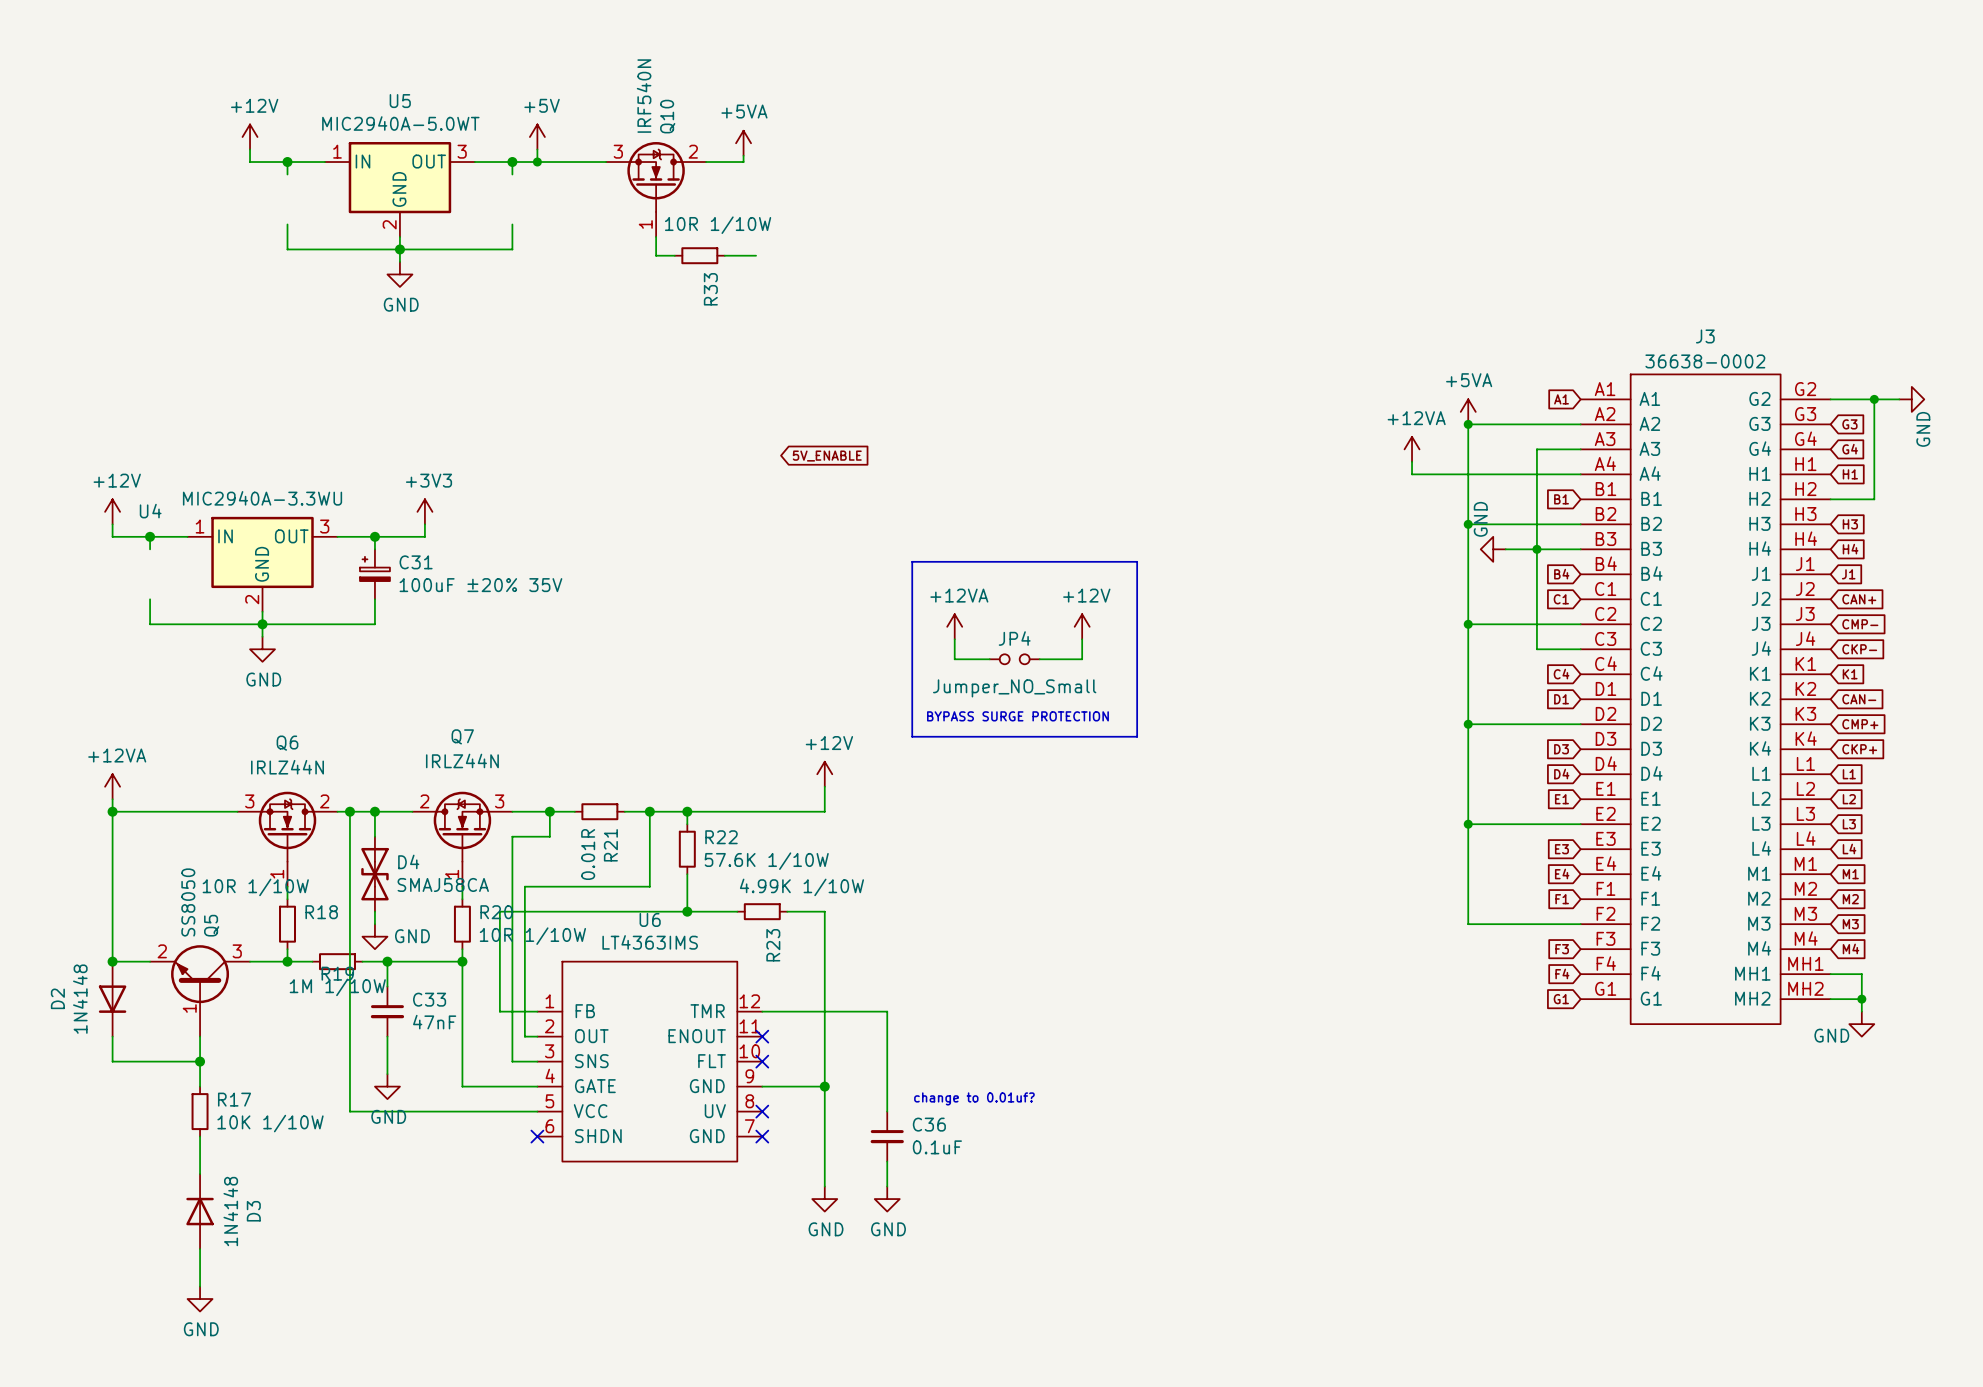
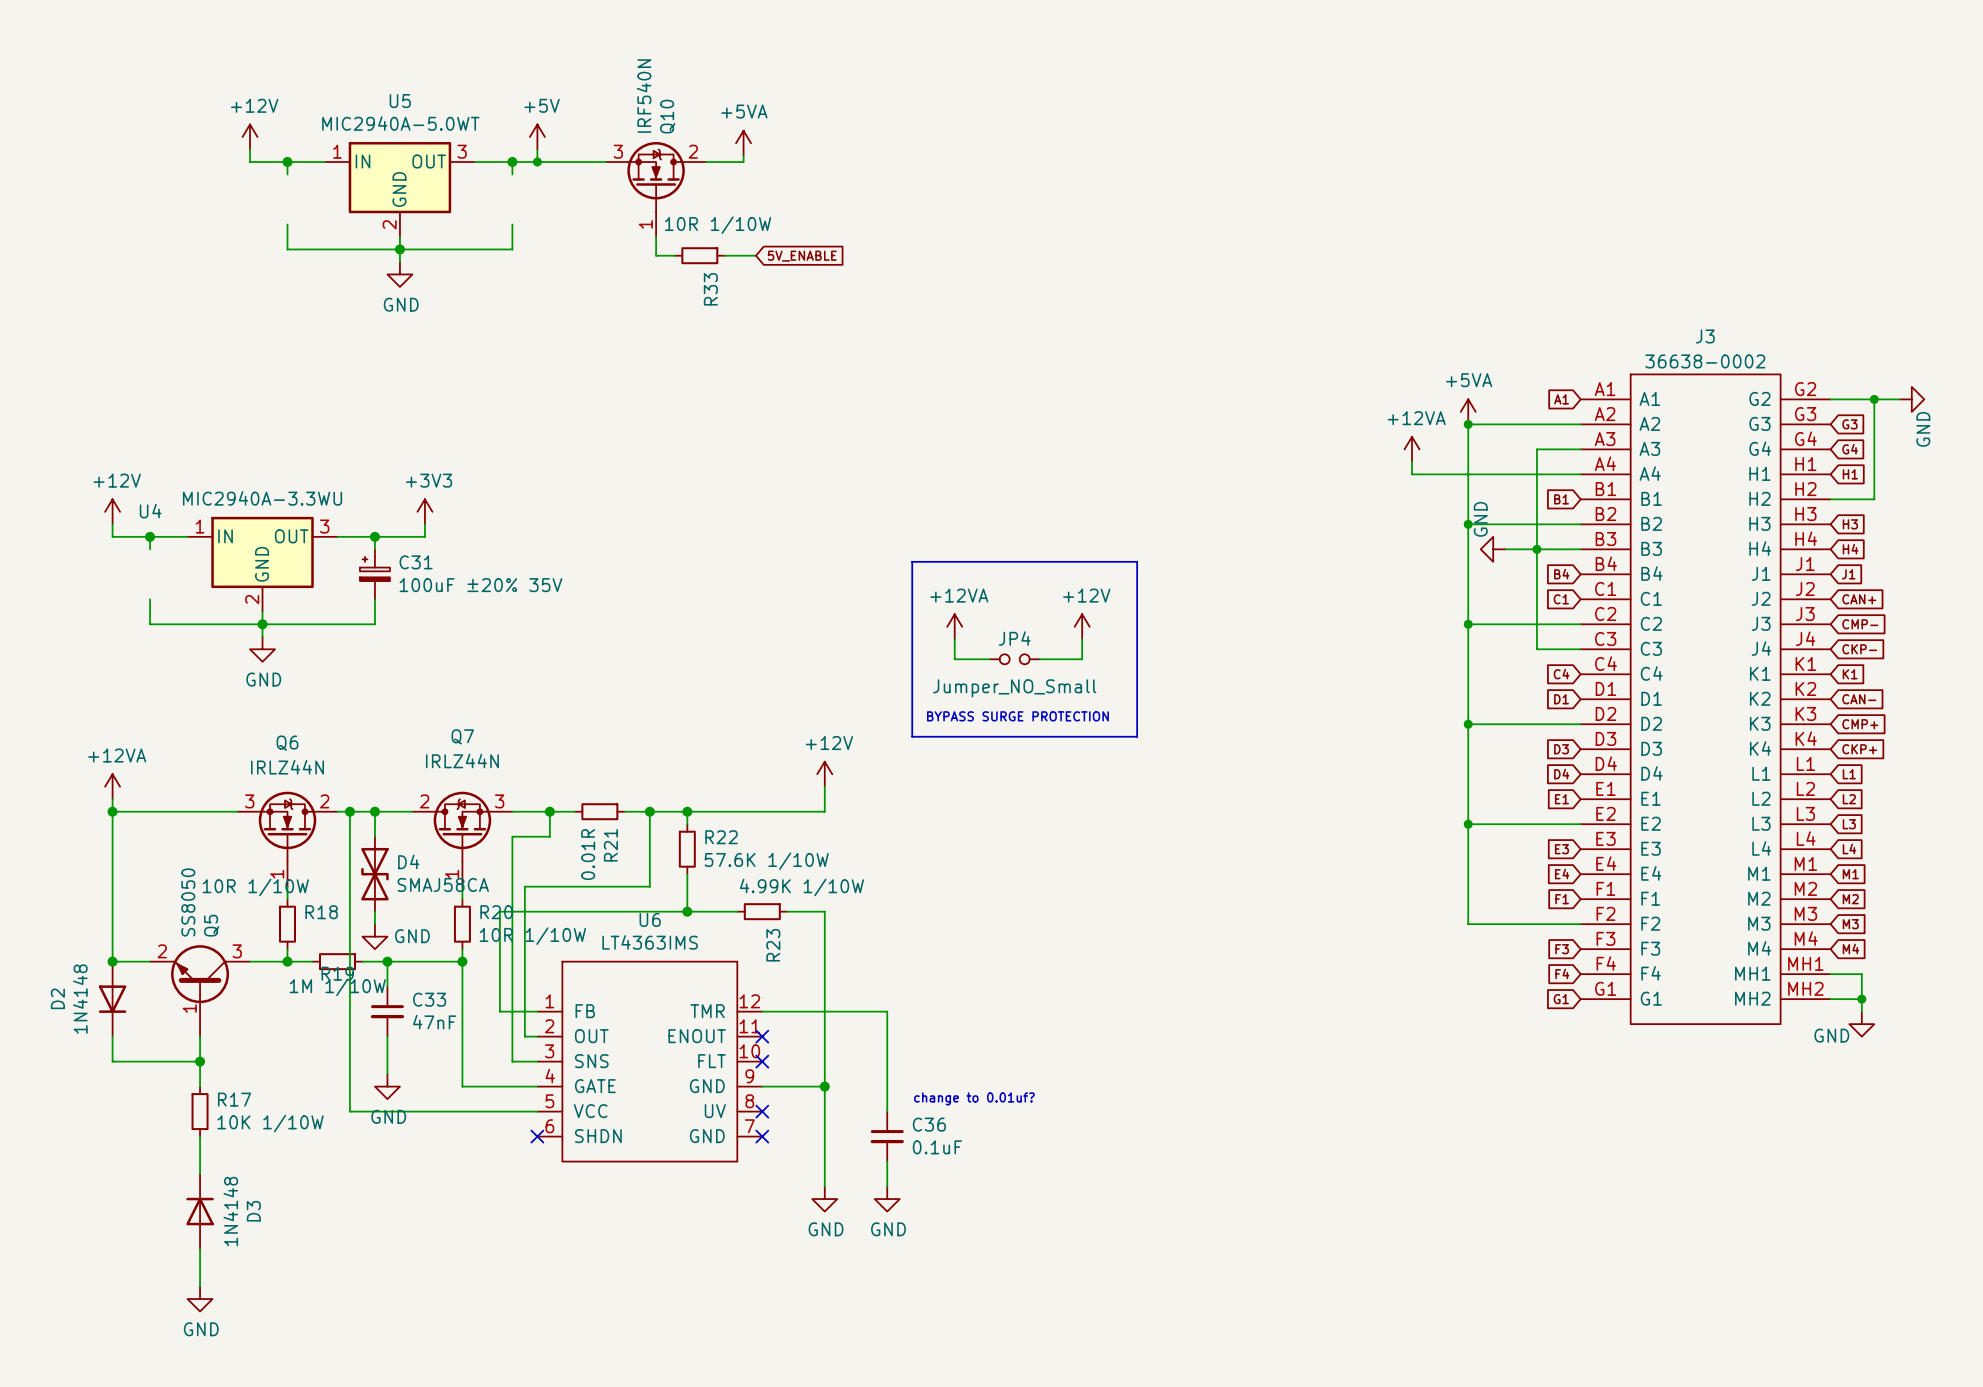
global label position: 5V_ENABLE (827, 456) -> 5V_ENABLE (802, 256)

